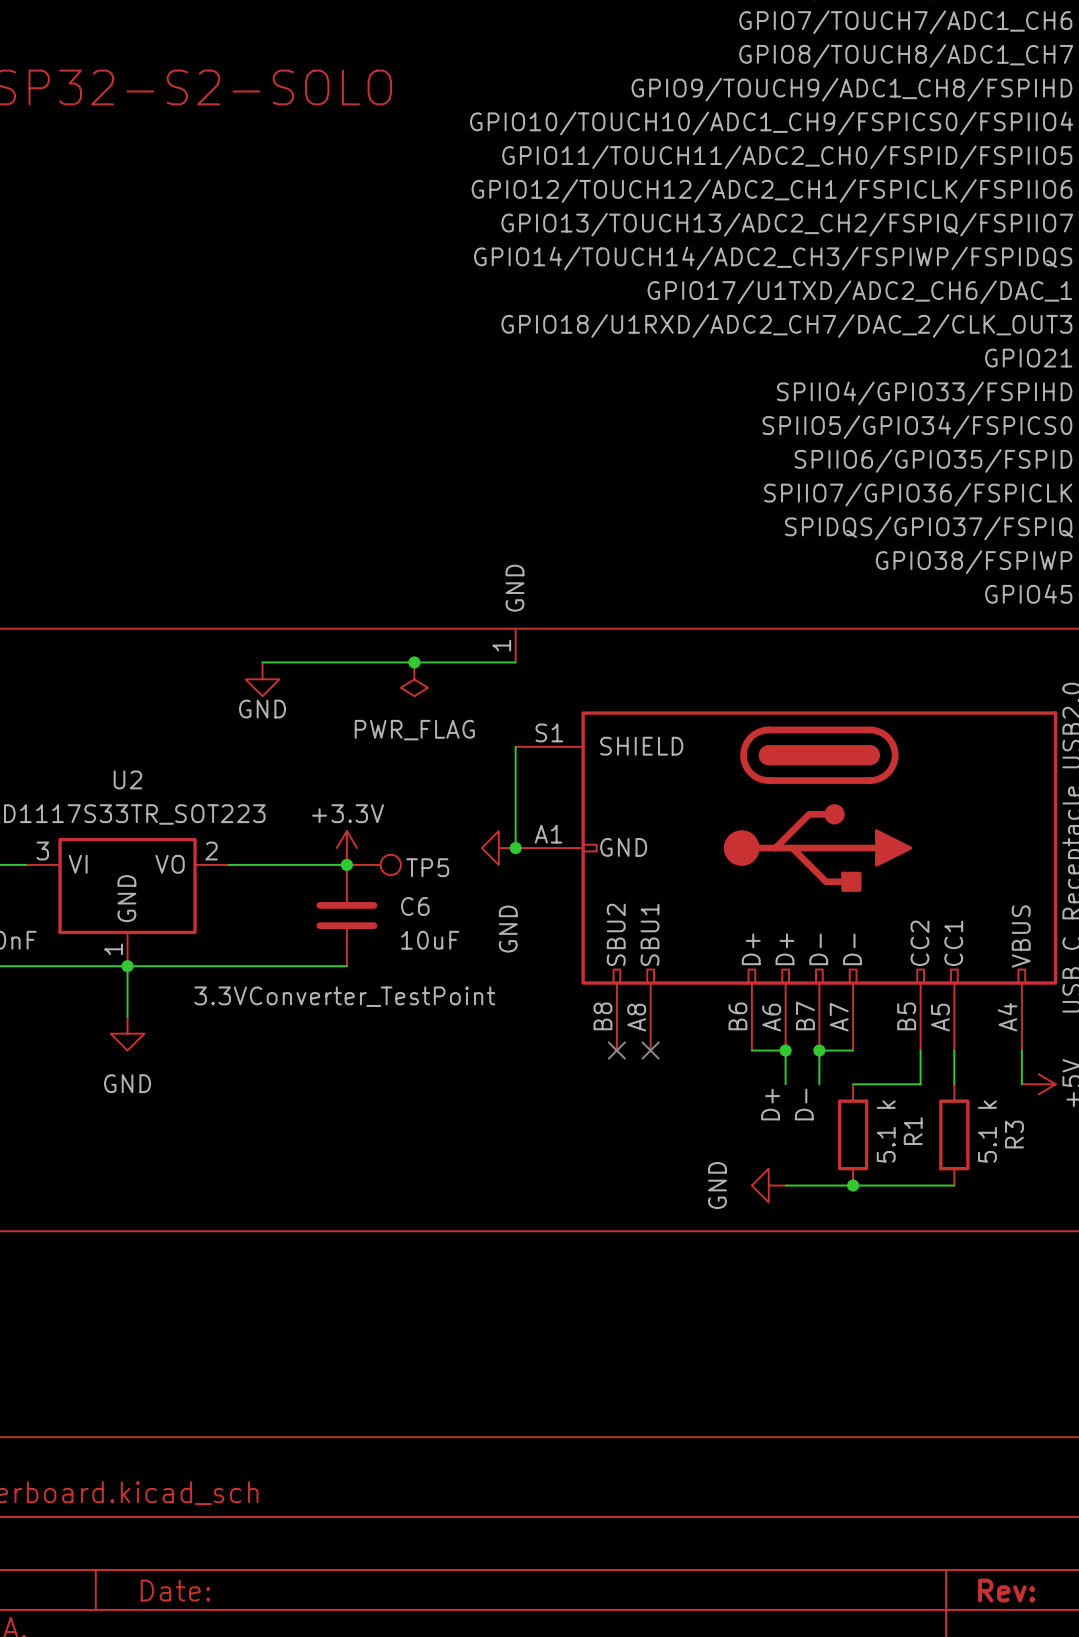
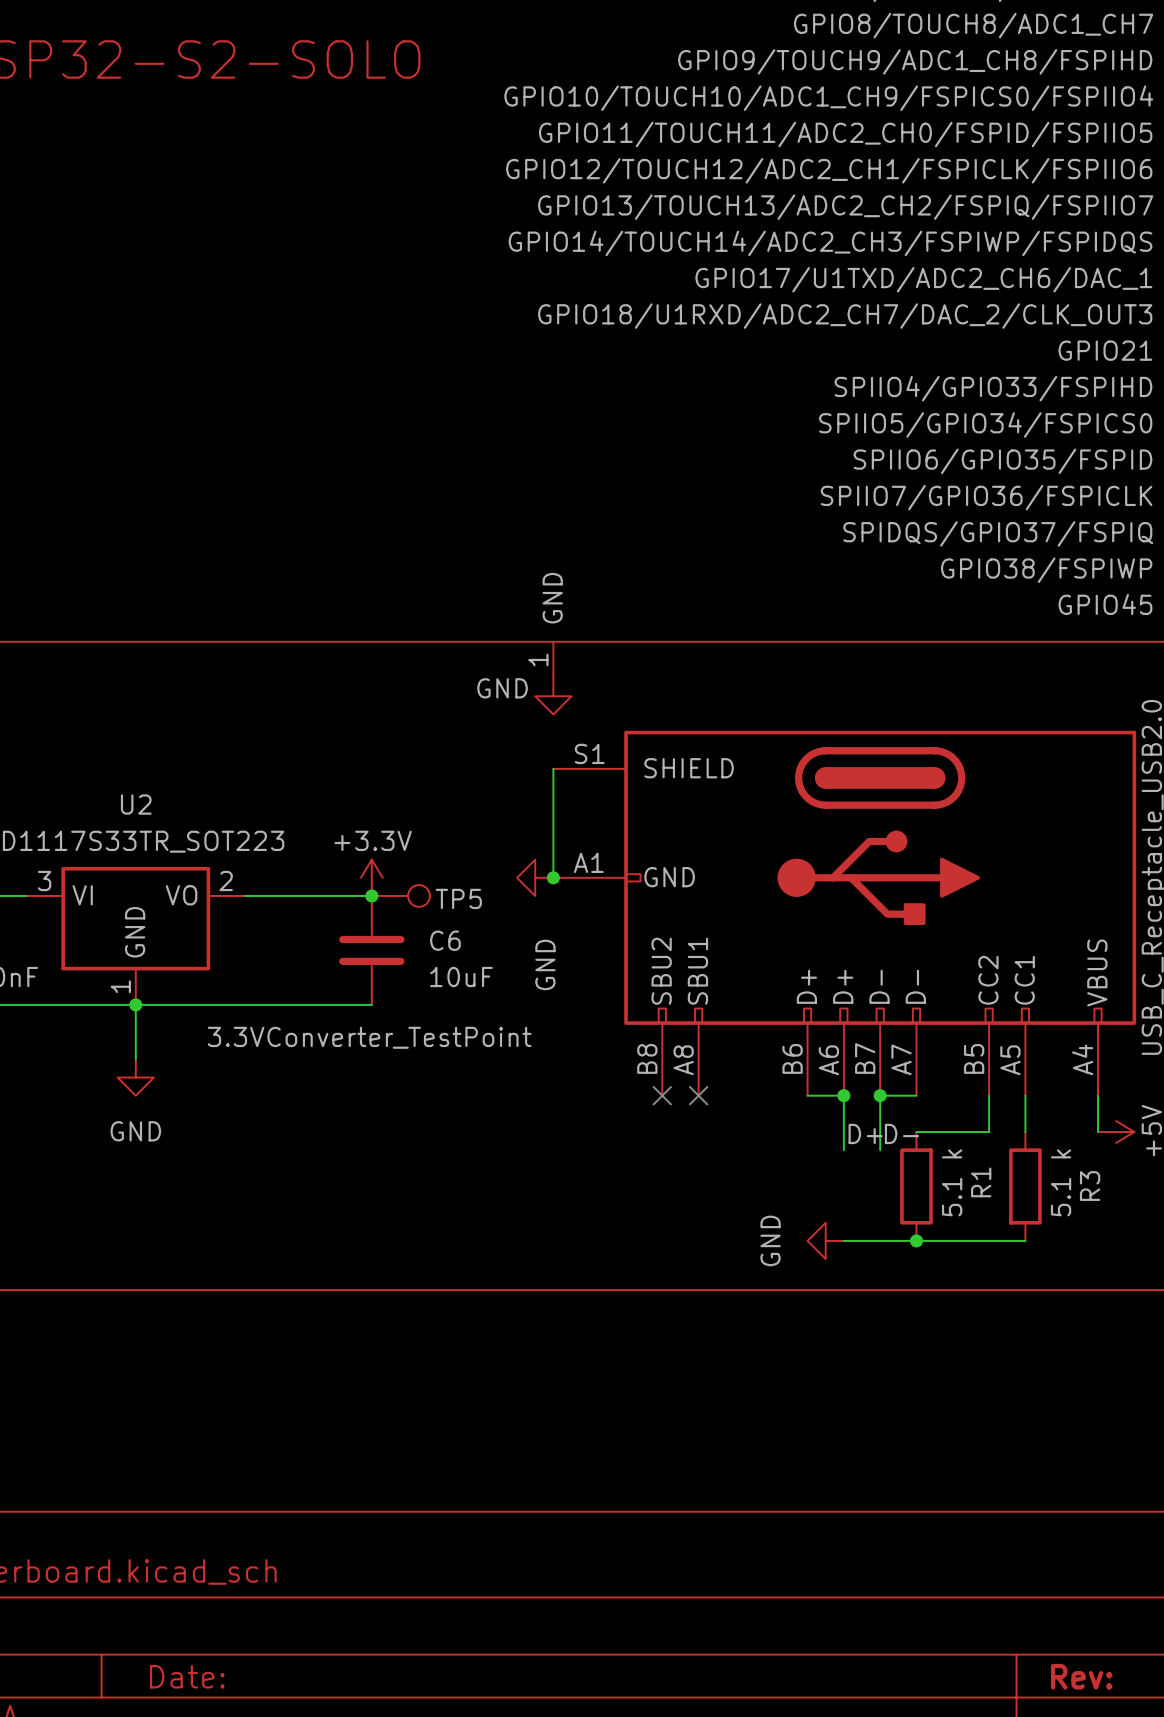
wire: (262, 662) (515, 662) -> none
junction: (414, 662) -> none
power symbol position: GND (262, 679) -> GND (553, 696)
power symbol: PWR_FLAG (414, 679) -> none
power symbol text position: GND (262, 709) -> GND (502, 688)
wire: none -> (843, 1132) (843, 1150)
wire: none -> (880, 1132) (880, 1150)
label rotation: 0° (770, 1104) -> 90° clockwise (865, 1133)
label rotation: 0° (804, 1104) -> 90° clockwise (901, 1133)

